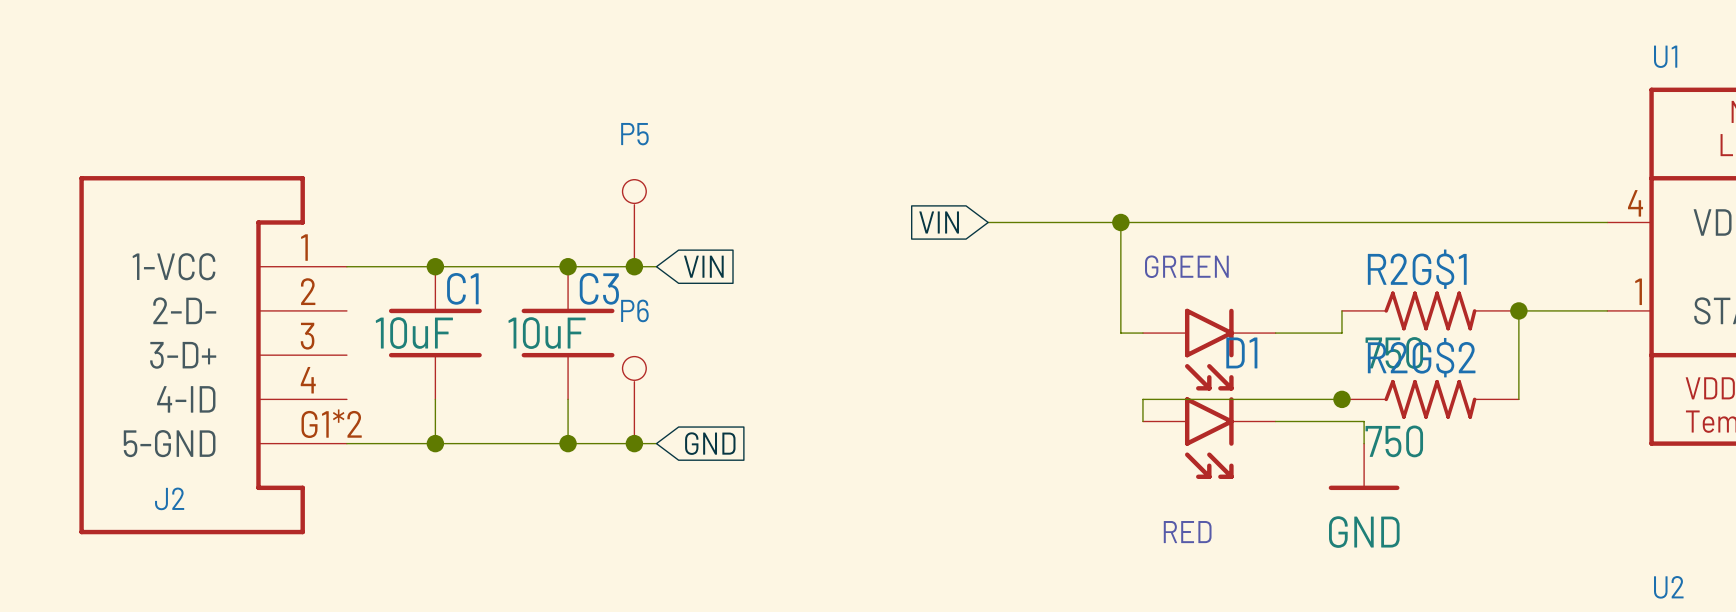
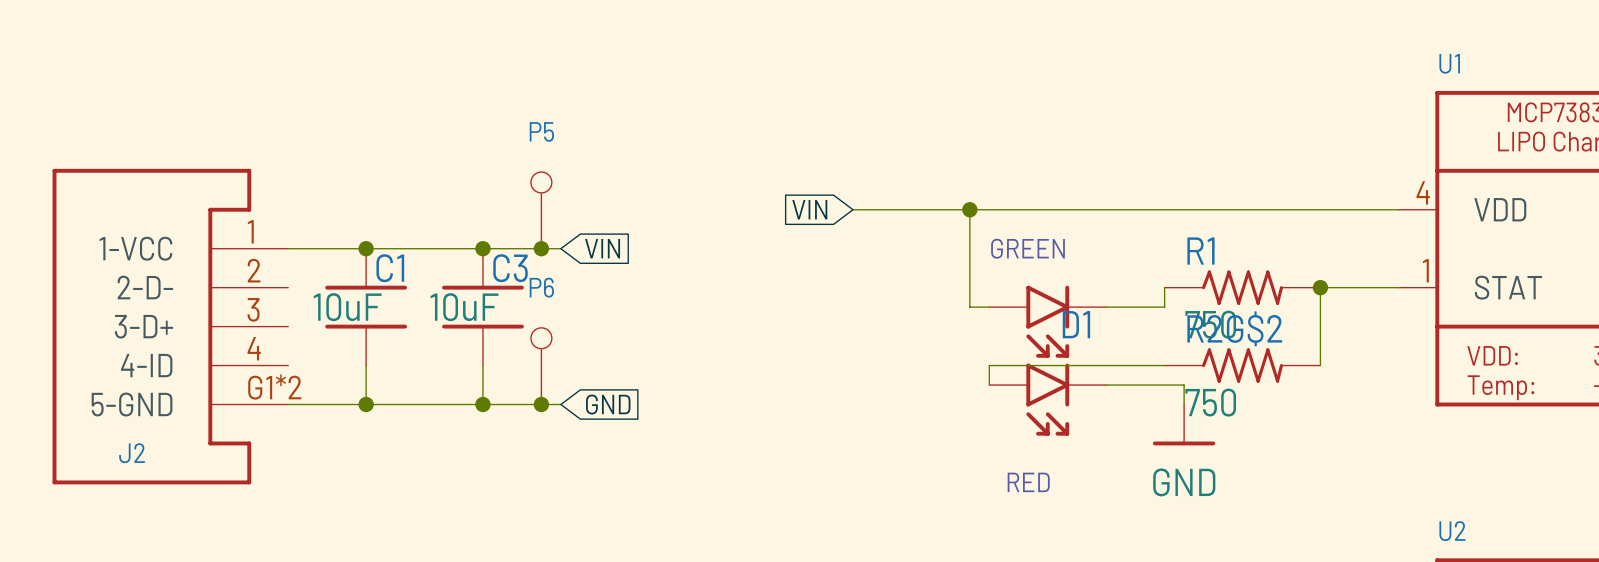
R2G$1 name: R2G$1 (1417, 269) -> R1 (1200, 251)
junction: (1341, 399) -> none

